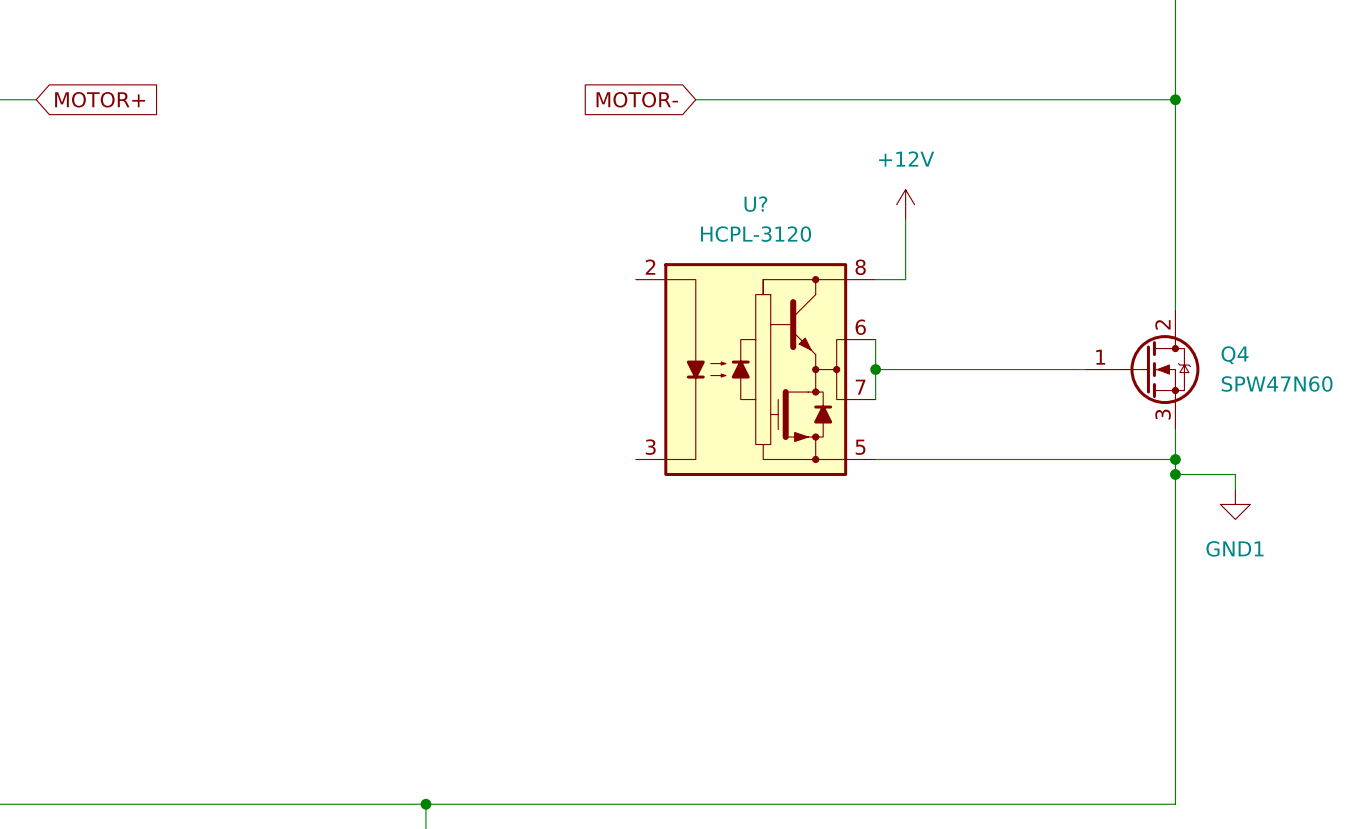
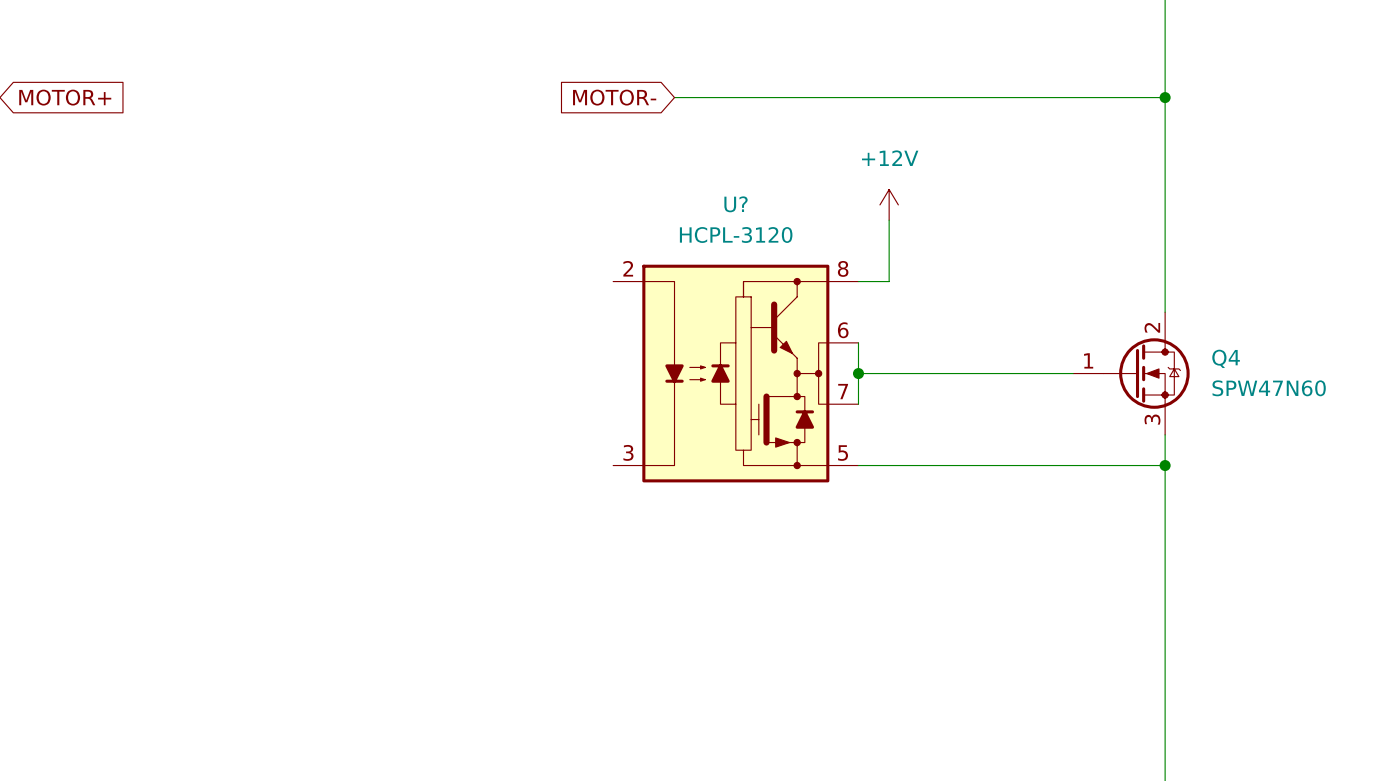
wire: (1175, 474) (1235, 474) (1235, 489) -> none
junction: (1175, 474) -> none
power symbol: GND1 (1235, 504) -> none

